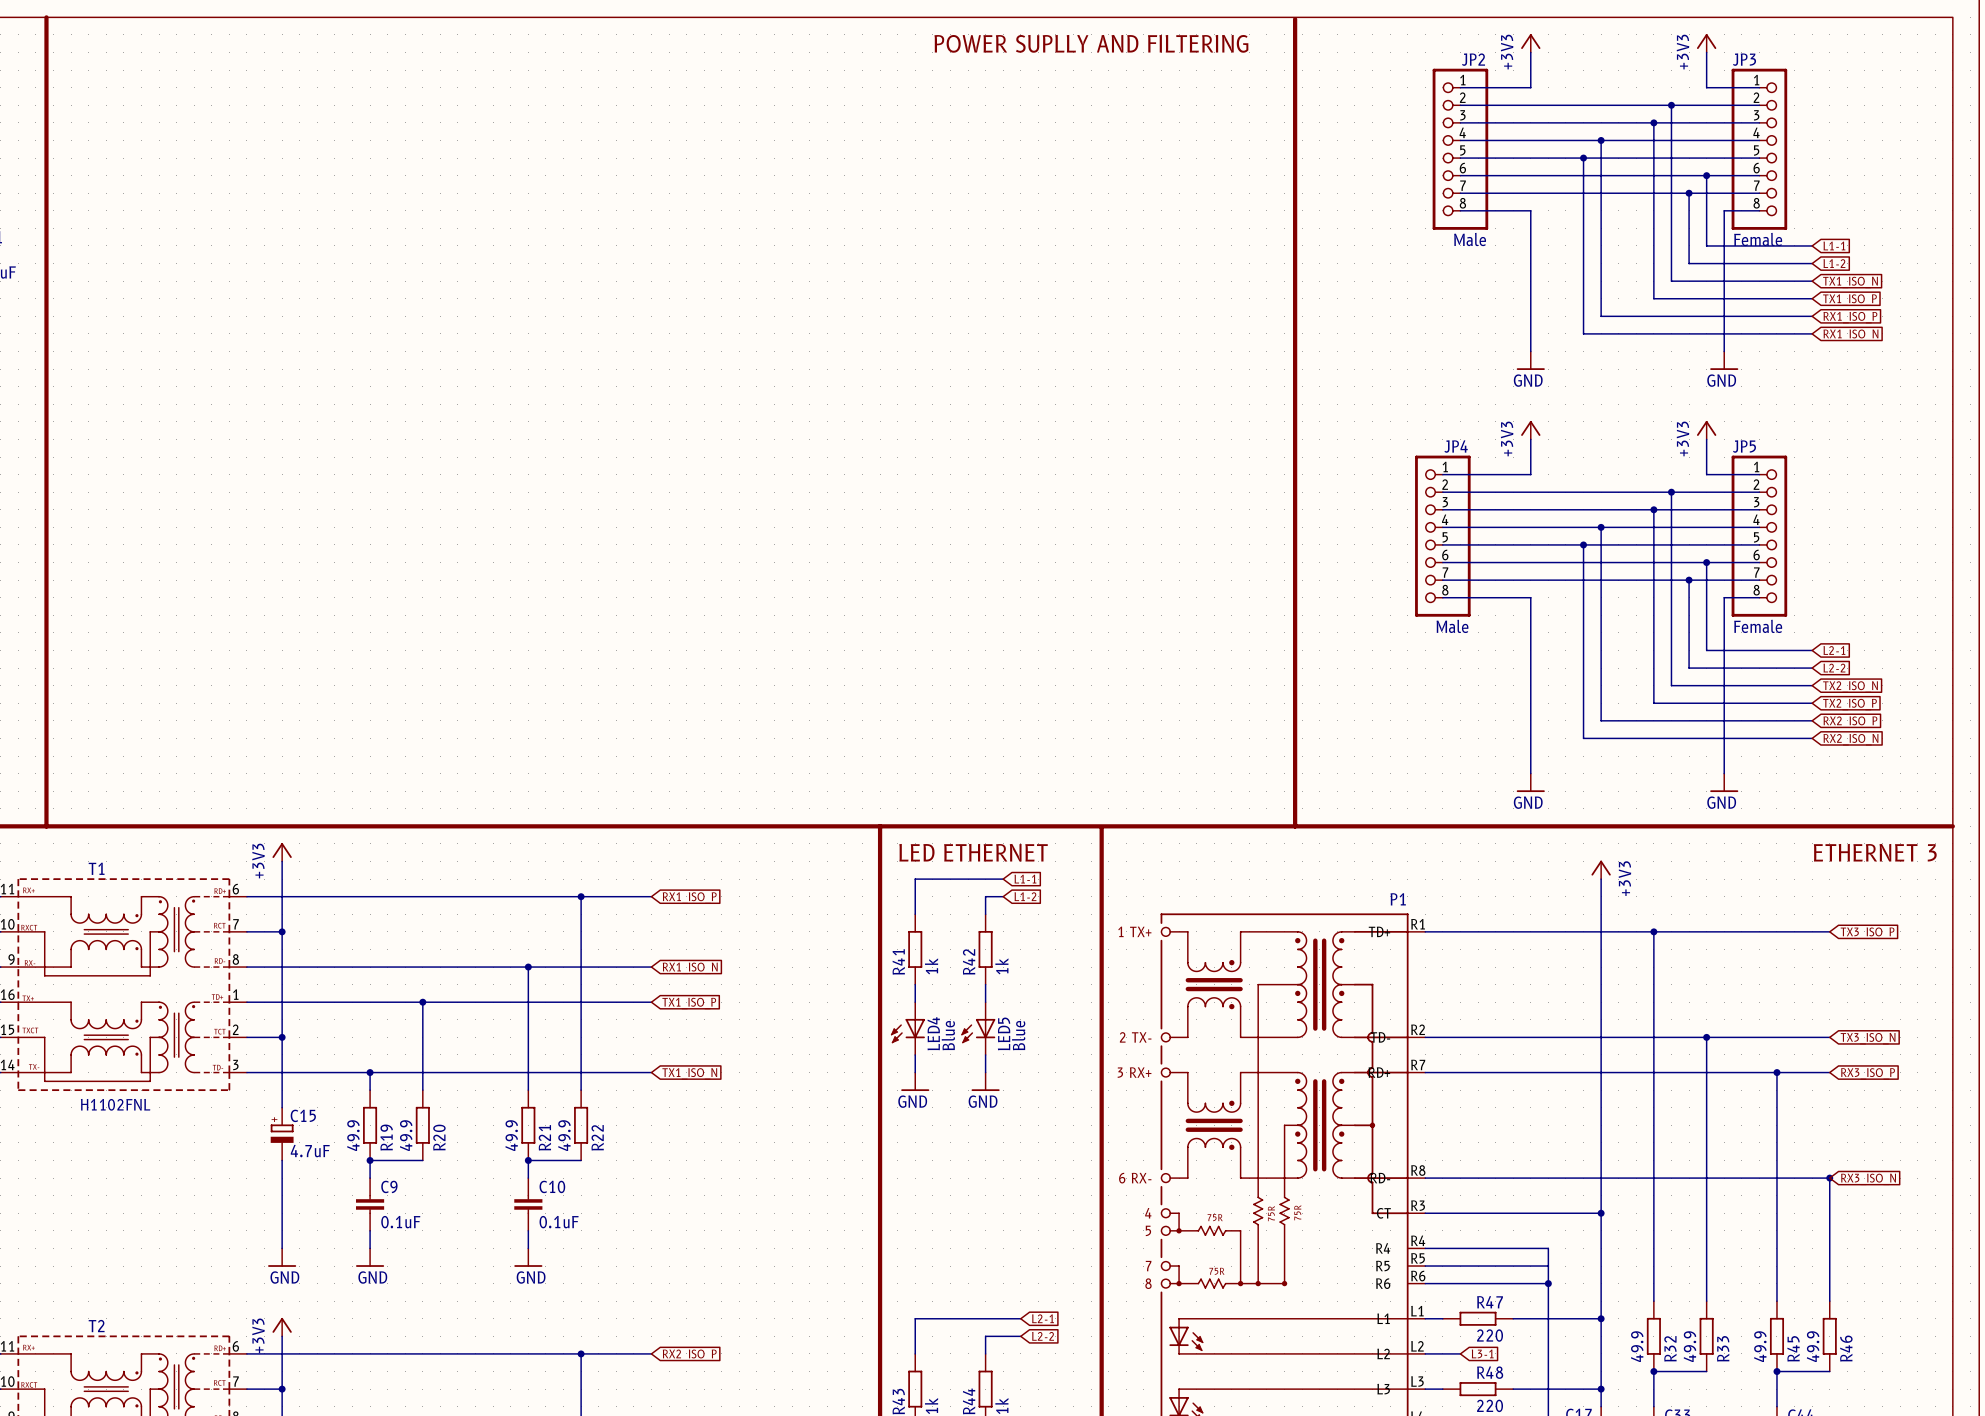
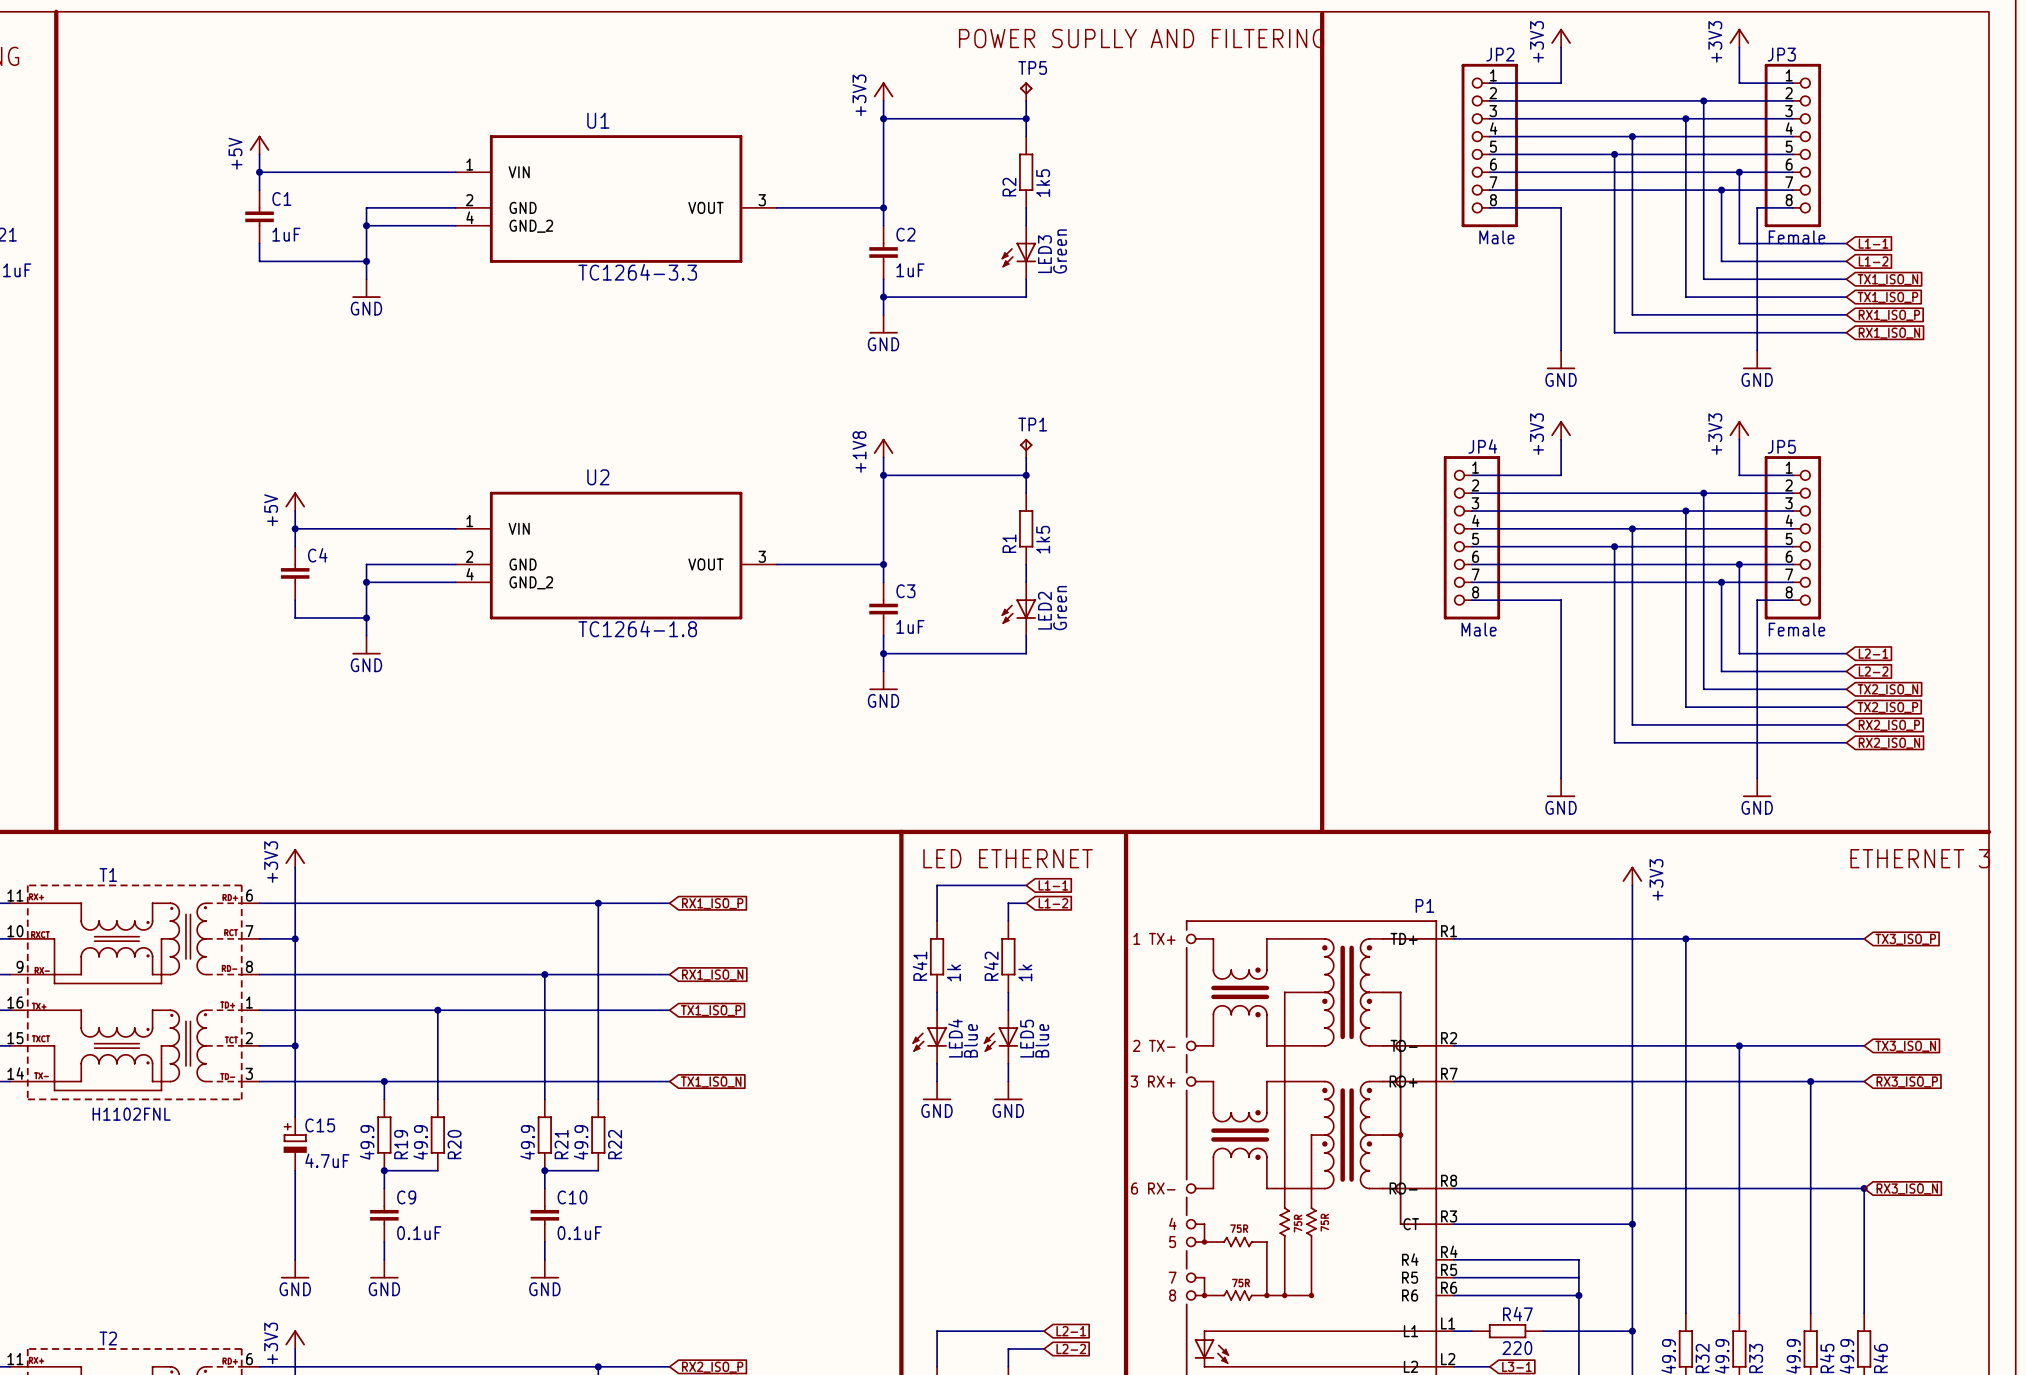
power symbol: none -> +3V3 (883, 91)
TP5: none -> (1026, 91)
wire: none -> (883, 100) (883, 225)
wire: none -> (1026, 100) (1026, 136)
wire: none -> (883, 118) (1026, 118)
junction: none -> (883, 118)
junction: none -> (1026, 118)
power symbol: none -> +5V (259, 145)
wire: none -> (259, 154) (259, 190)
wire: none -> (259, 172) (455, 172)
junction: none -> (259, 172)
R2: none -> 1k5 (1026, 172)
U1: none -> TC1264-3.3 (616, 199)
wire: none -> (455, 207) (366, 207) (366, 279)
wire: none -> (776, 207) (883, 207)
junction: none -> (883, 207)
wire: none -> (1026, 207) (1026, 225)
C1: none -> 1uF (259, 216)
wire: none -> (366, 225) (455, 225)
junction: none -> (366, 225)
wire: none -> (259, 243) (259, 261) (366, 261)
C2: none -> 1uF (883, 252)
LED3: none -> Green (1018, 252)
junction: none -> (366, 261)
wire: none -> (883, 279) (883, 314)
wire: none -> (1026, 279) (1026, 297) (883, 297)
power symbol: none -> GND (366, 288)
junction: none -> (883, 297)
power symbol: none -> GND (883, 324)
power symbol: none -> +1V8 (883, 448)
TP1: none -> (1026, 448)
wire: none -> (883, 457) (883, 582)
wire: none -> (1026, 457) (1026, 493)
wire: none -> (883, 475) (1026, 475)
junction: none -> (883, 475)
junction: none -> (1026, 475)
power symbol: none -> +5V (295, 501)
wire: none -> (295, 511) (295, 546)
wire: none -> (295, 528) (455, 528)
junction: none -> (295, 528)
R1: none -> 1k5 (1026, 528)
U2: none -> TC1264-1.8 (616, 555)
wire: none -> (455, 564) (366, 564) (366, 635)
wire: none -> (776, 564) (883, 564)
junction: none -> (883, 564)
wire: none -> (1026, 564) (1026, 582)
C4: none -> (295, 573)
wire: none -> (366, 582) (455, 582)
junction: none -> (366, 582)
wire: none -> (295, 600) (295, 617) (366, 617)
C3: none -> 1uF (883, 609)
LED2: none -> Green (1018, 609)
junction: none -> (366, 617)
wire: none -> (883, 635) (883, 671)
wire: none -> (1026, 635) (1026, 653) (883, 653)
power symbol: none -> GND (366, 645)
junction: none -> (883, 653)
power symbol: none -> GND (883, 680)

